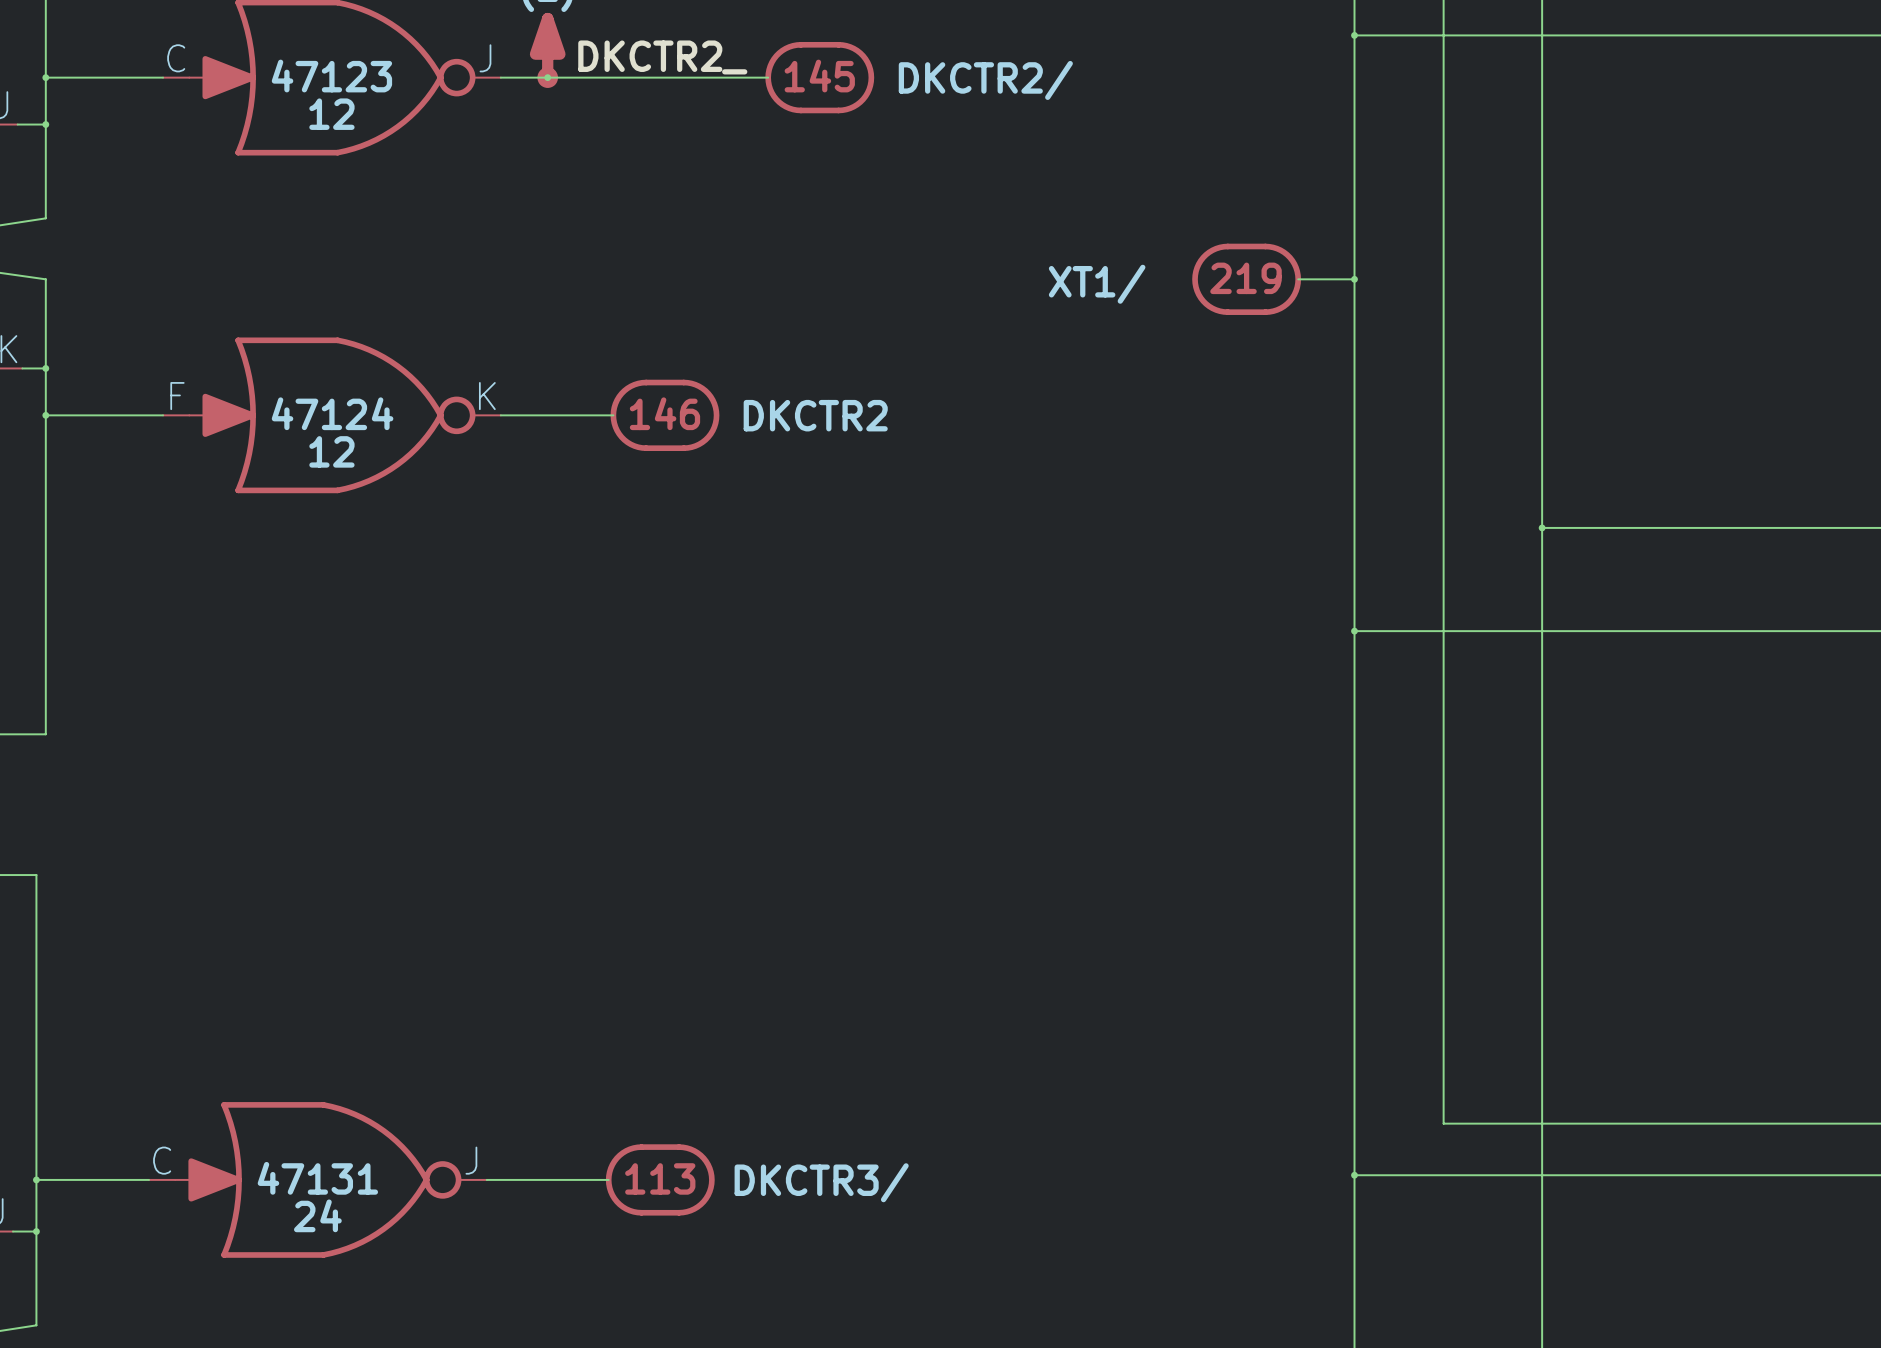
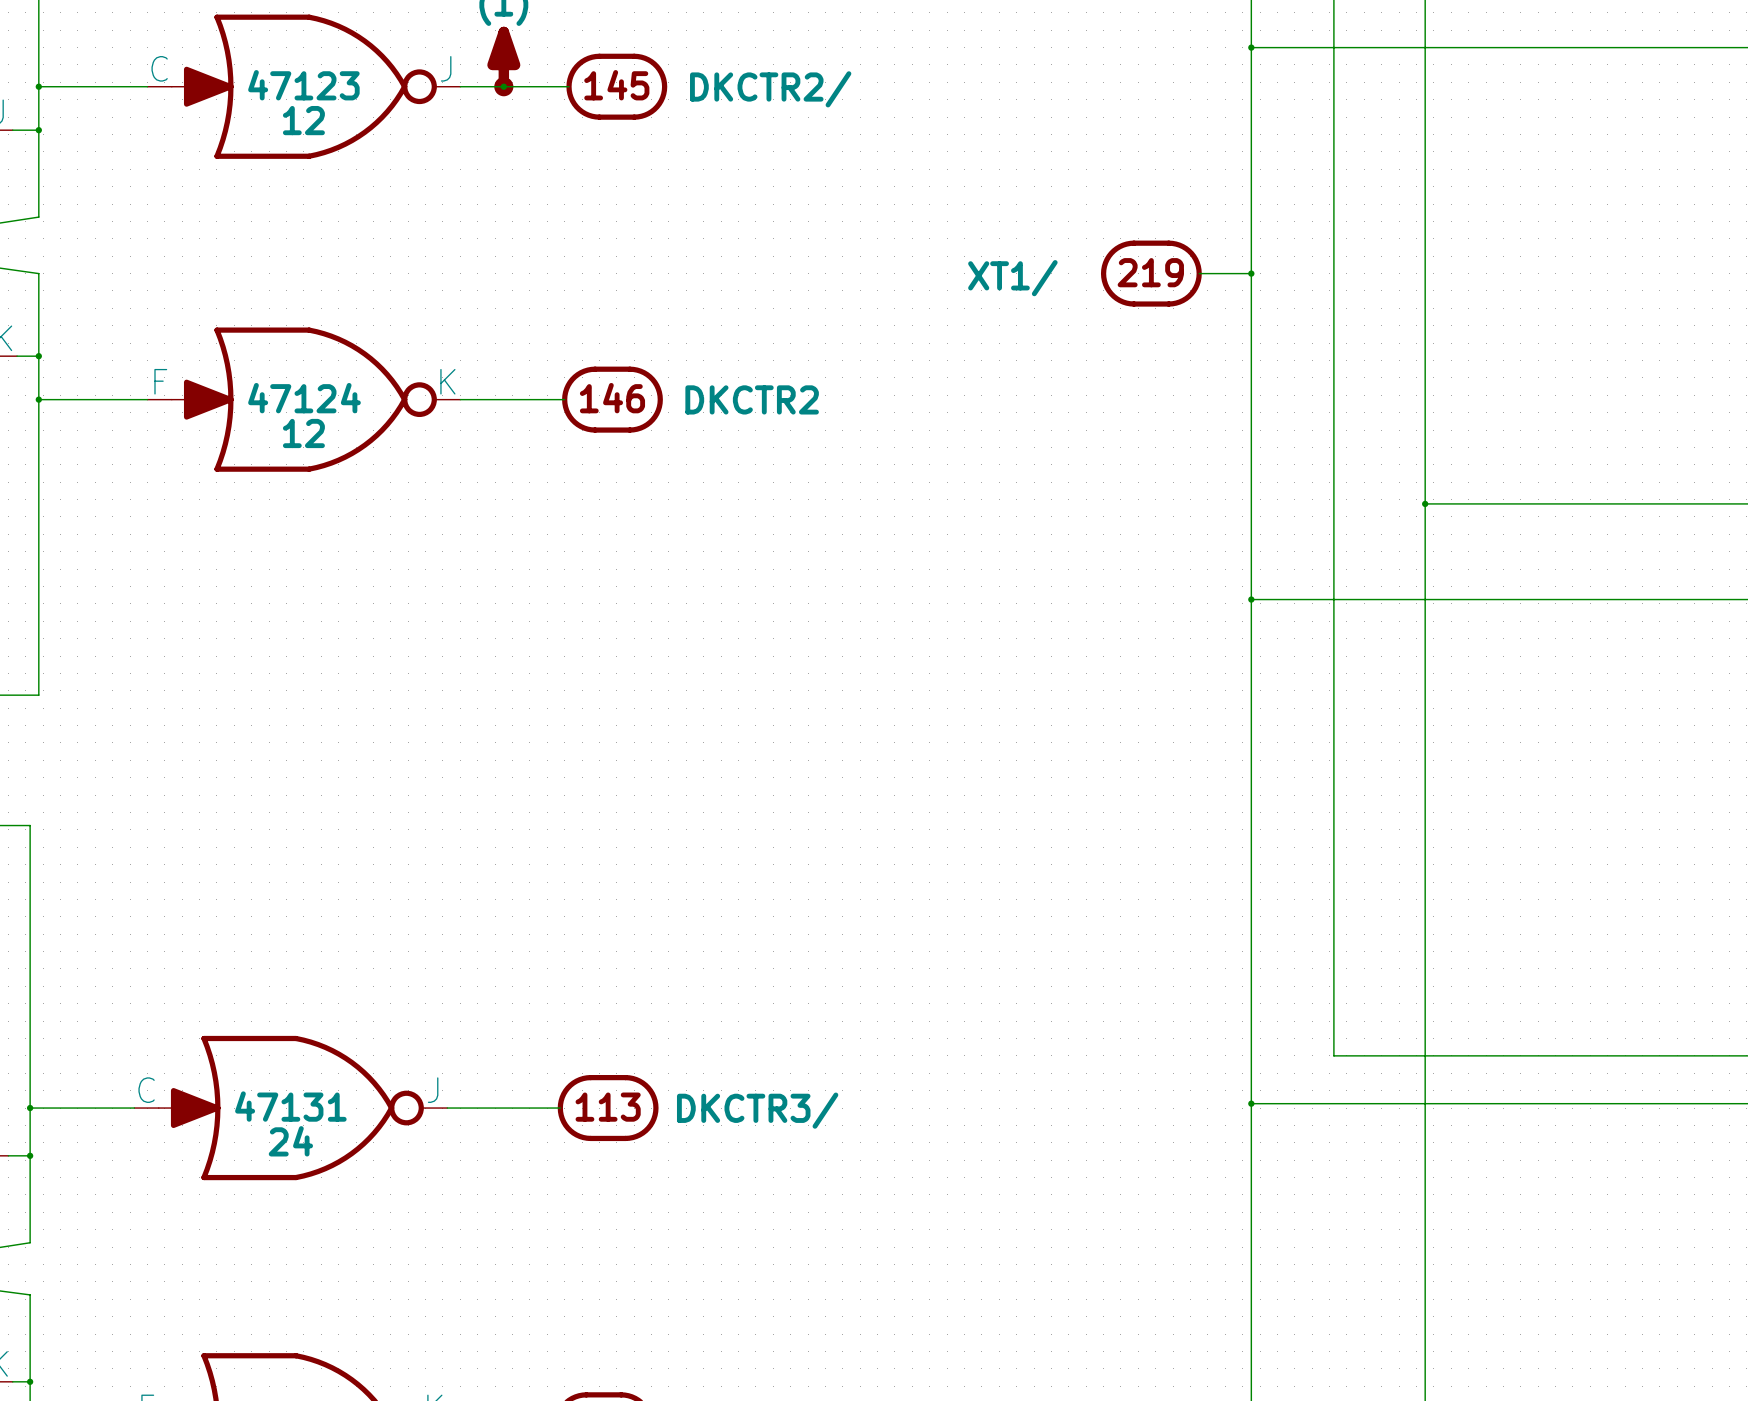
label: DKCTR2_ (662, 57) -> none
wire: (618, 77) (768, 77) -> none
part position: (819, 77) -> (616, 86)

